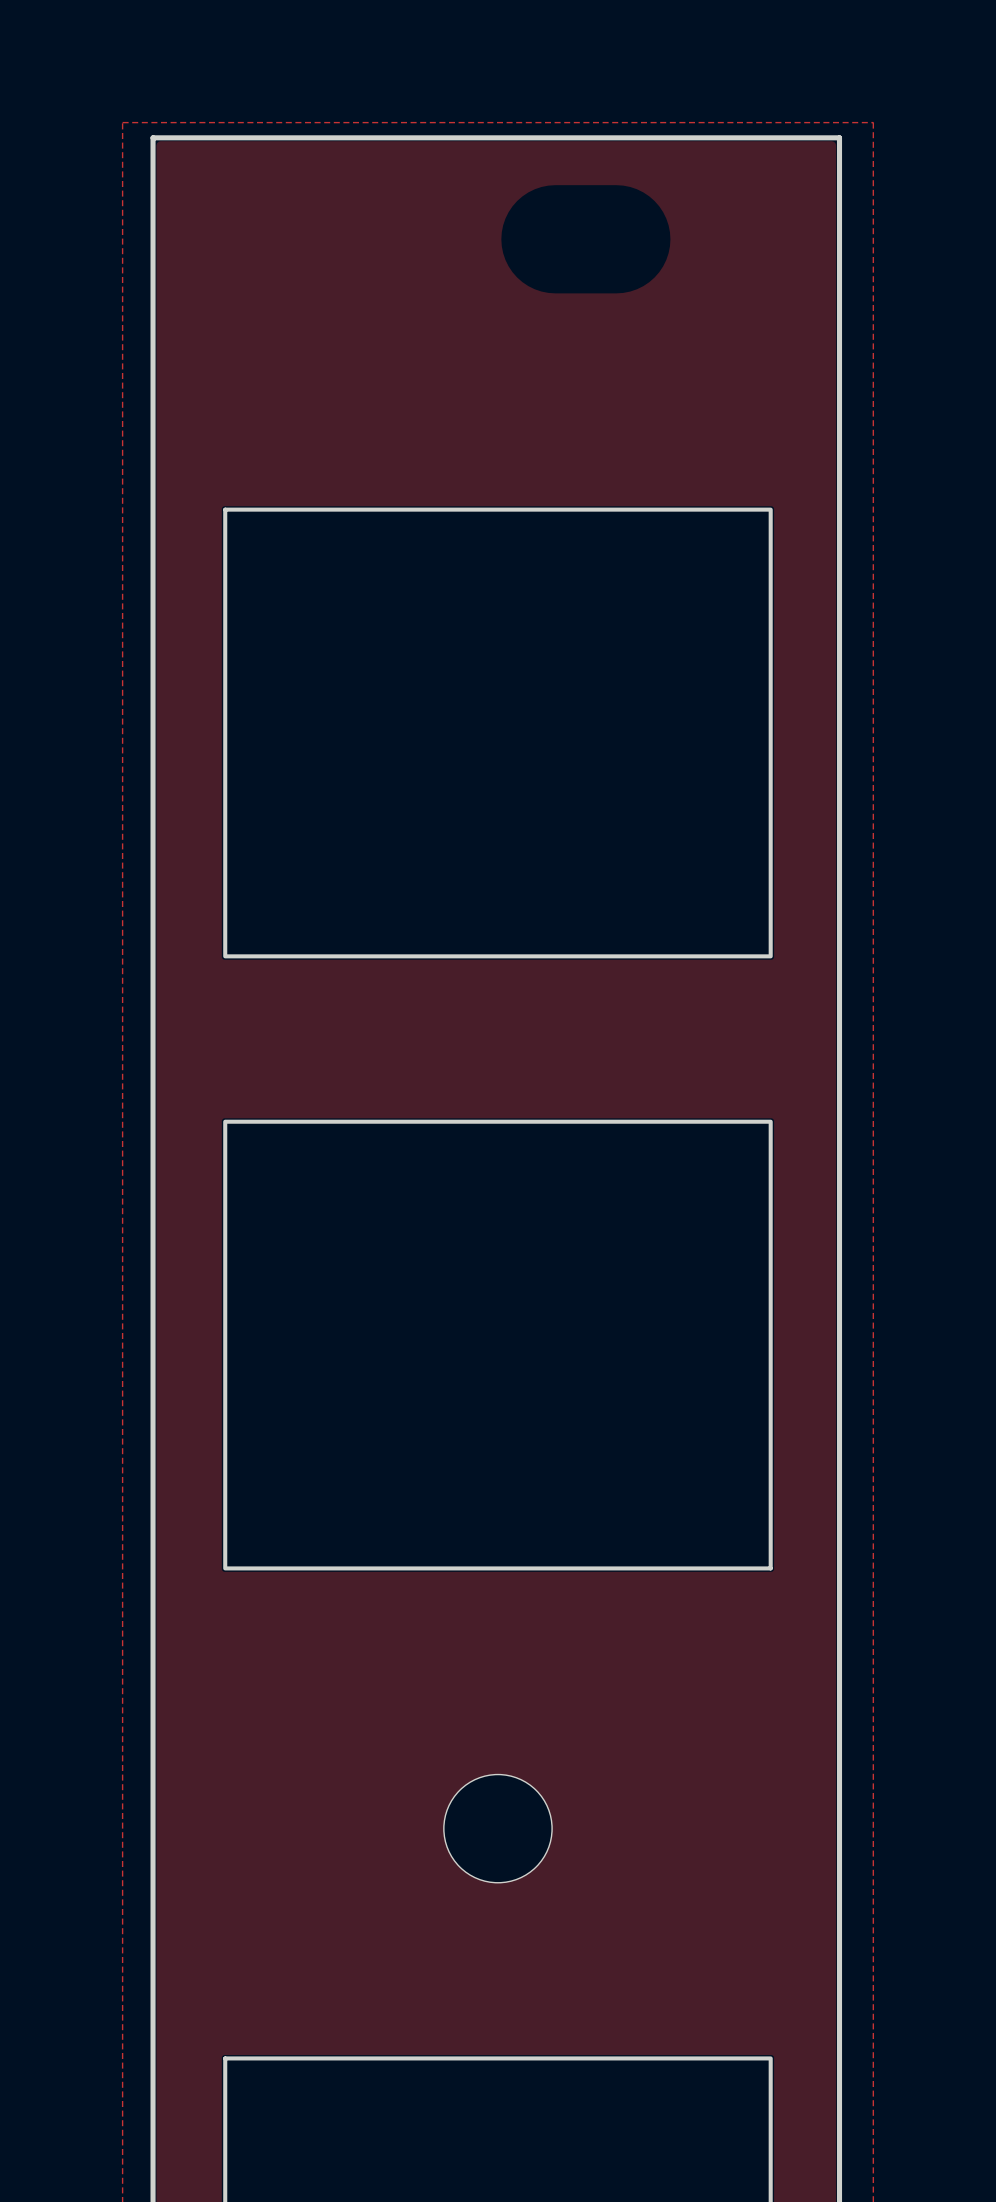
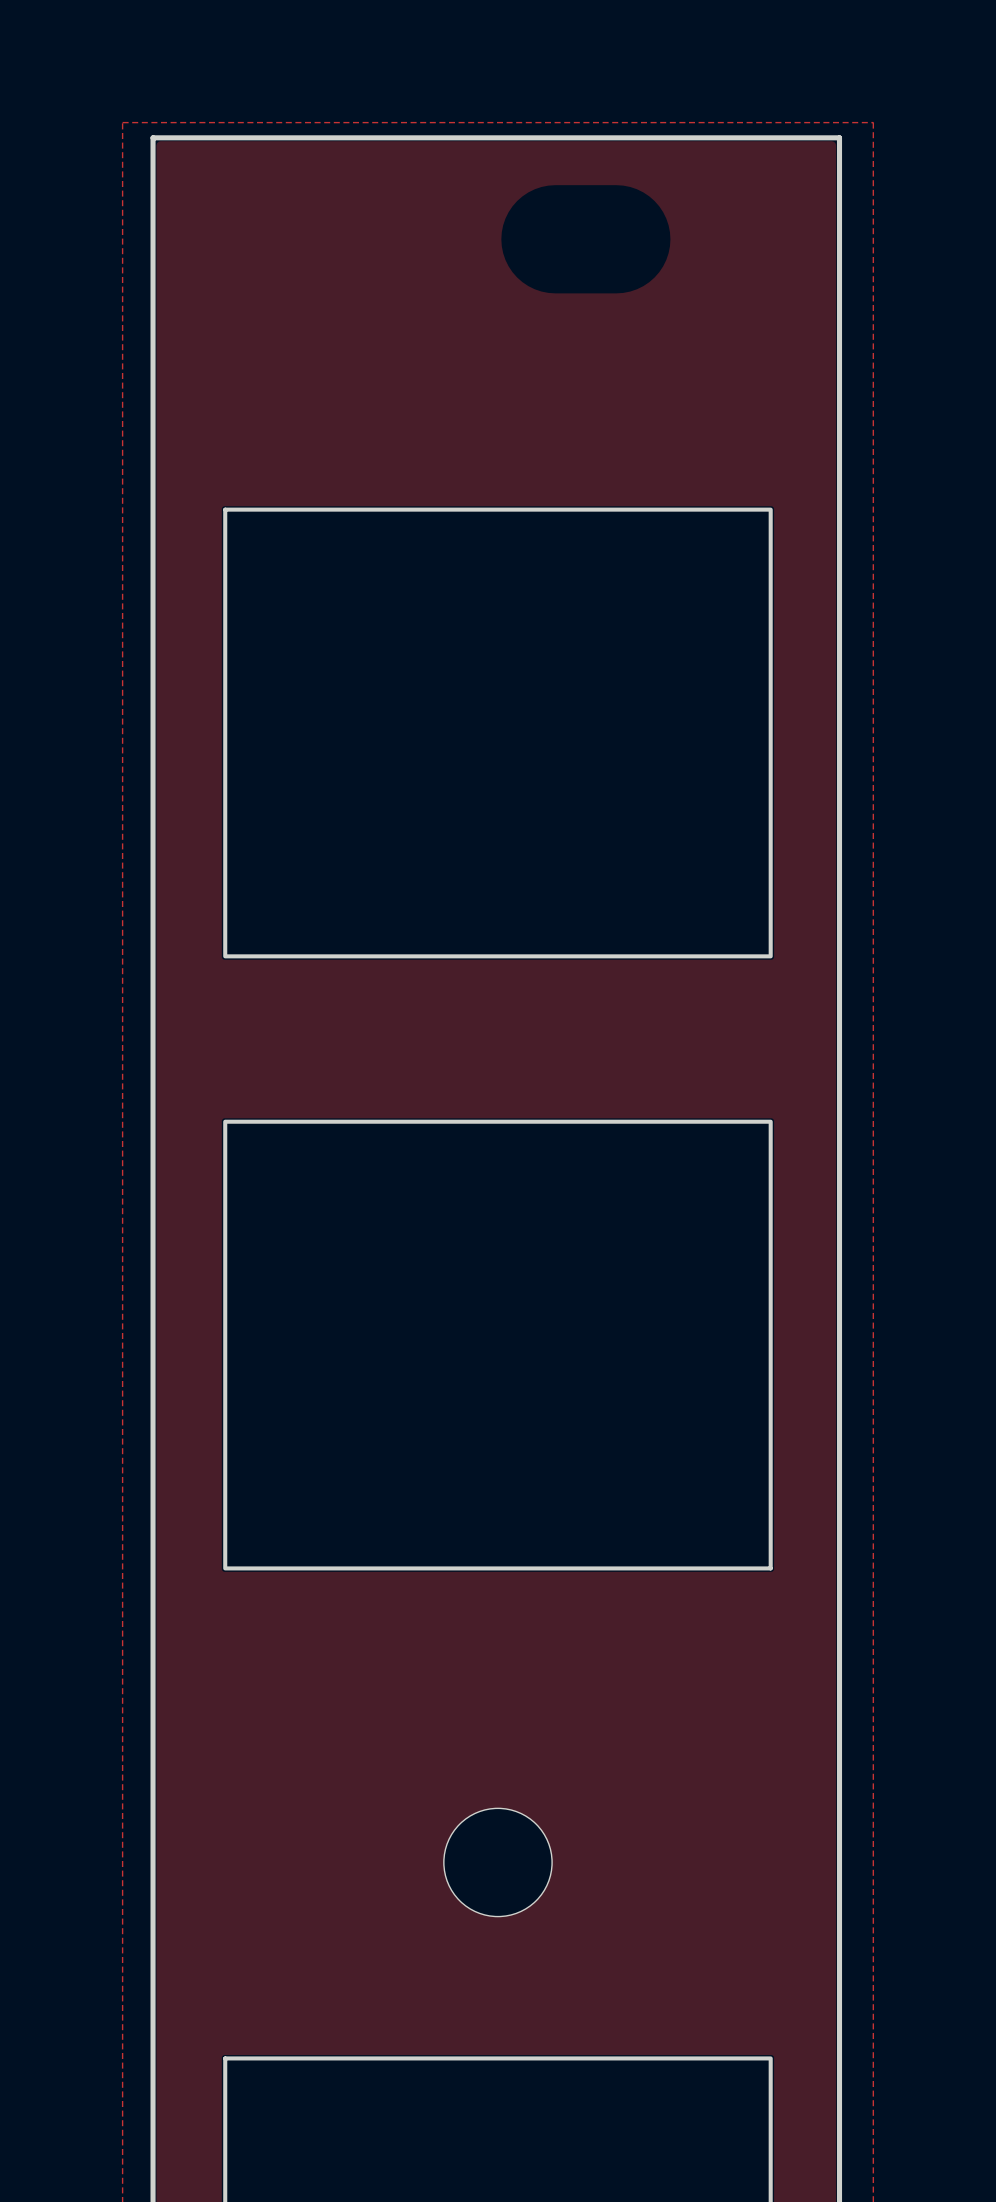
part position: (497, 1828) -> (497, 1862)

